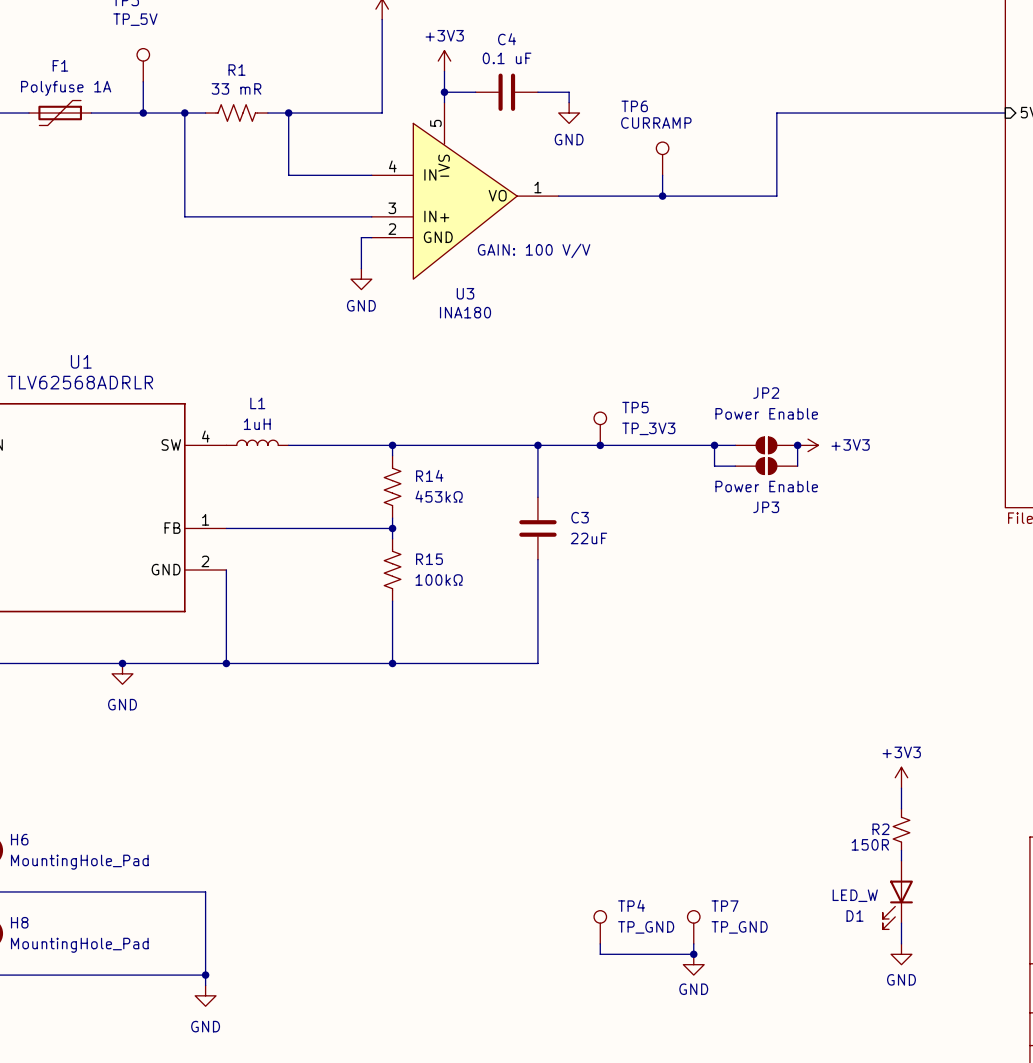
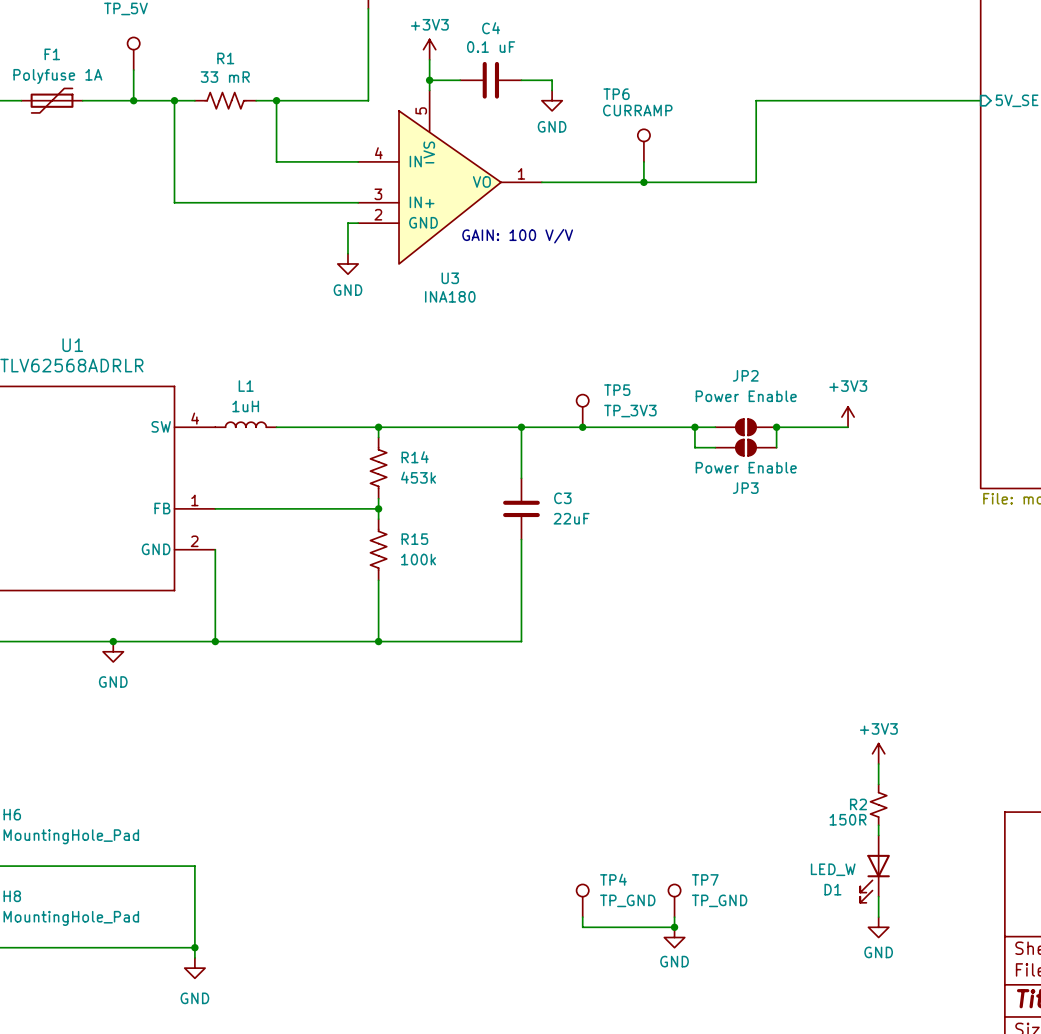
wire: none -> (776, 427) (848, 427)
power symbol rotation: 0° (808, 445) -> 90° counterclockwise (848, 417)
power symbol position: +3V3 (808, 445) -> +3V3 (848, 417)
R14 value: 453kΩ (439, 496) -> 453k (418, 477)
R15 value: 100kΩ (439, 580) -> 100k (418, 559)

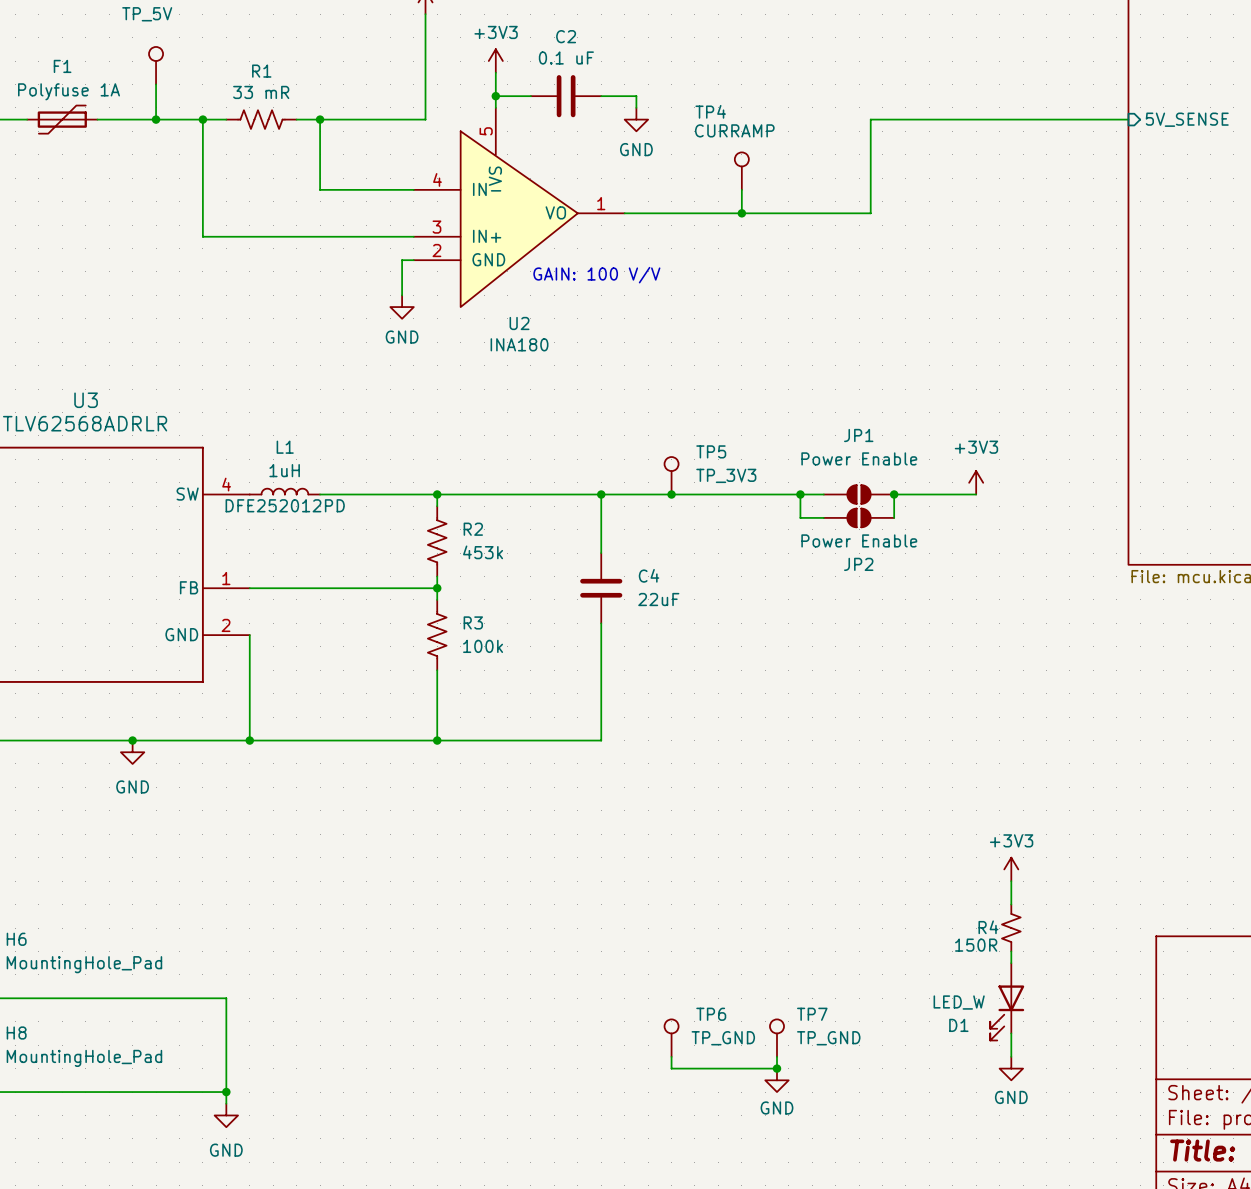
C4 name: C4 (491, 28) -> C2 (566, 36)
TP6 name: TP6 (616, 94) -> TP4 (710, 111)
U3 name: U3 (450, 278) -> U2 (519, 323)
U1 name: U1 (72, 345) -> U3 (86, 400)
JP2 name: JP2 (745, 375) -> JP1 (858, 435)
L1 text: none -> DFE252012PD (285, 505)
R14 name: R14 (415, 457) -> R2 (473, 529)
JP3 name: JP3 (745, 488) -> JP2 (858, 564)
C3 name: C3 (562, 498) -> C4 (649, 575)
R15 name: R15 (414, 539) -> R3 (473, 622)
R2 name: R2 (858, 804) -> R4 (988, 927)
TP4 name: TP4 (613, 879) -> TP6 (711, 1014)

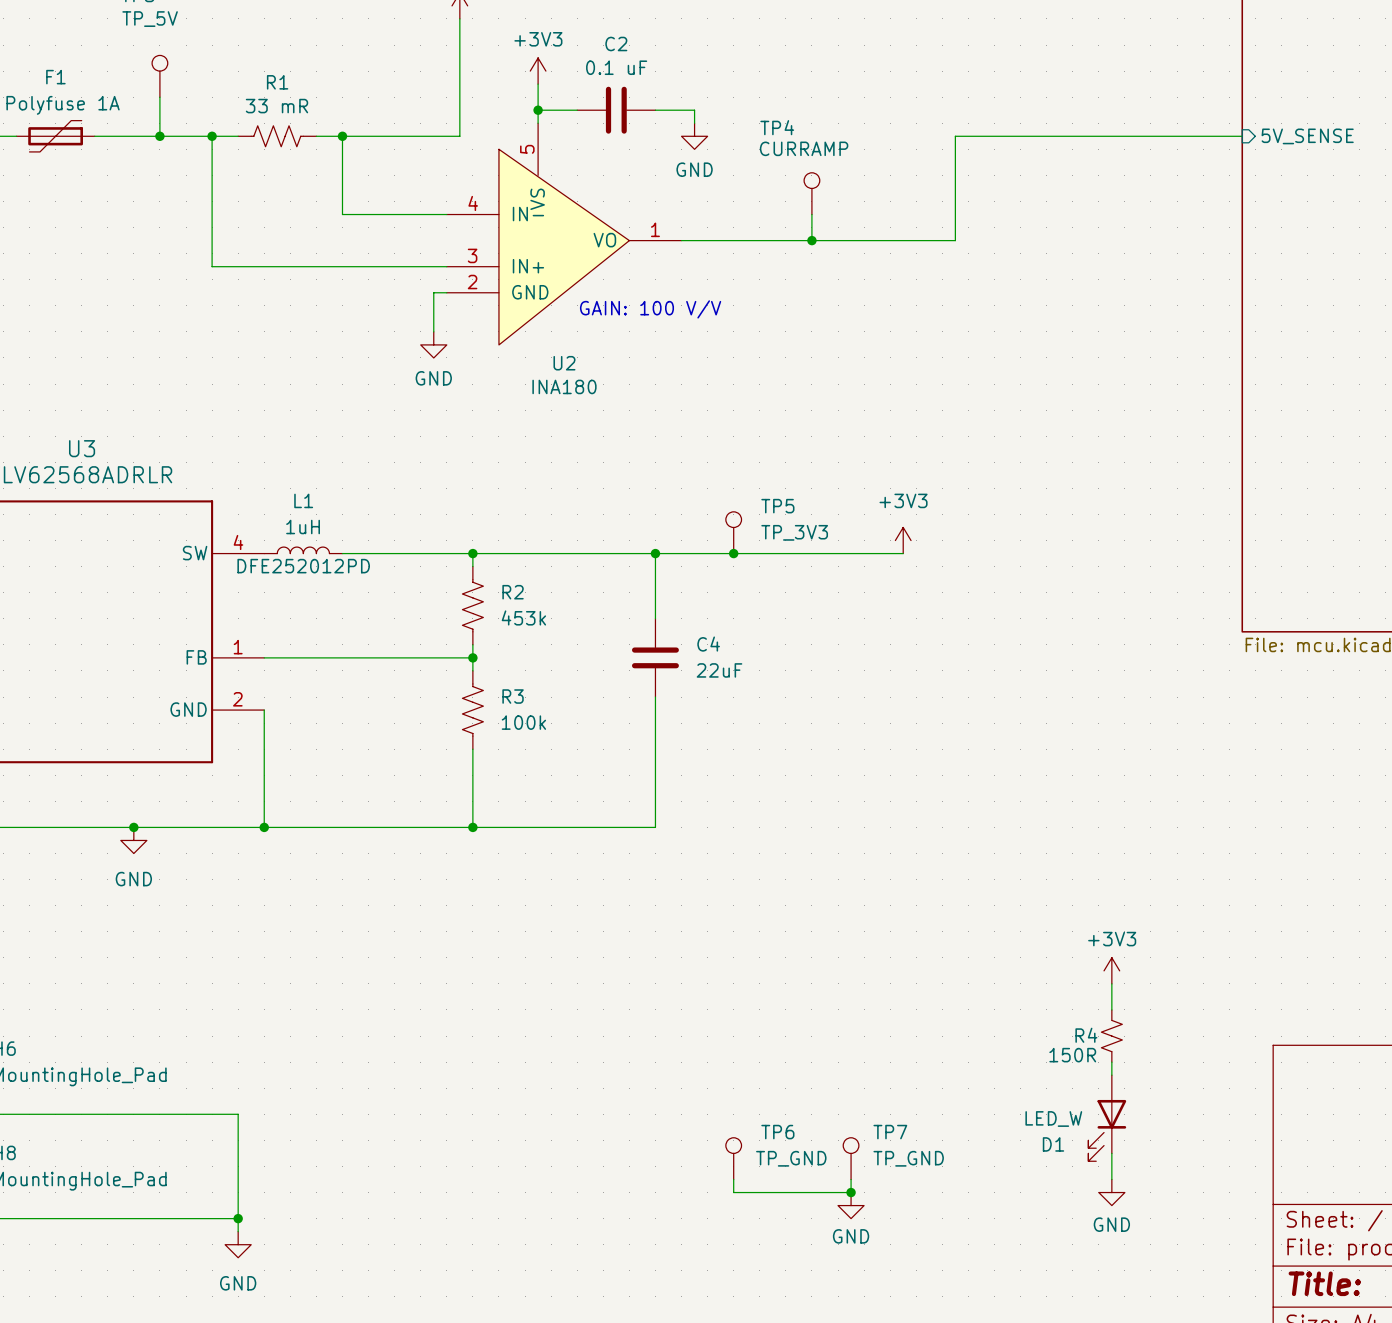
power symbol position: +3V3 (976, 482) -> +3V3 (903, 540)
wire: (800, 494) (800, 517) (823, 517) -> none
junction: (800, 494) -> none
JP1: Power Enable (859, 494) -> none
junction: (894, 494) -> none
wire: (976, 494) (894, 494) (894, 517) -> none
JP2: Power Enable (859, 517) -> none

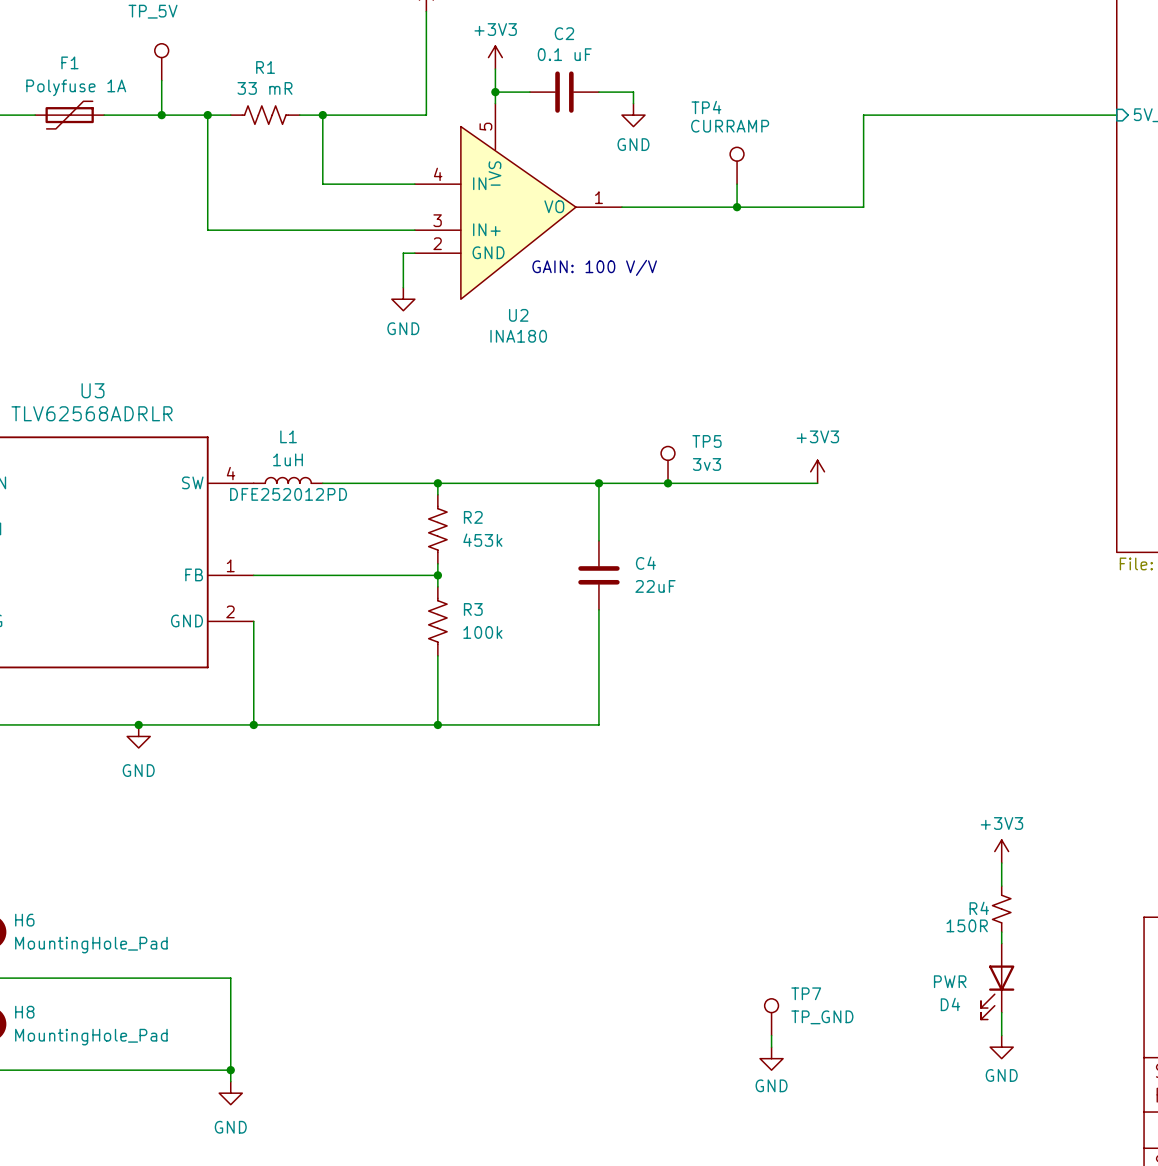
TP5 value: TP_3V3 (794, 532) -> 3v3 (706, 464)
D1 value: LED_W (1053, 1119) -> PWR (950, 981)
D1 name: D1 (1053, 1144) -> D4 (950, 1004)
TP6: TP_GND (733, 1158) -> none
wire: (733, 1179) (733, 1192) (851, 1192) -> none
junction: (851, 1192) -> none

